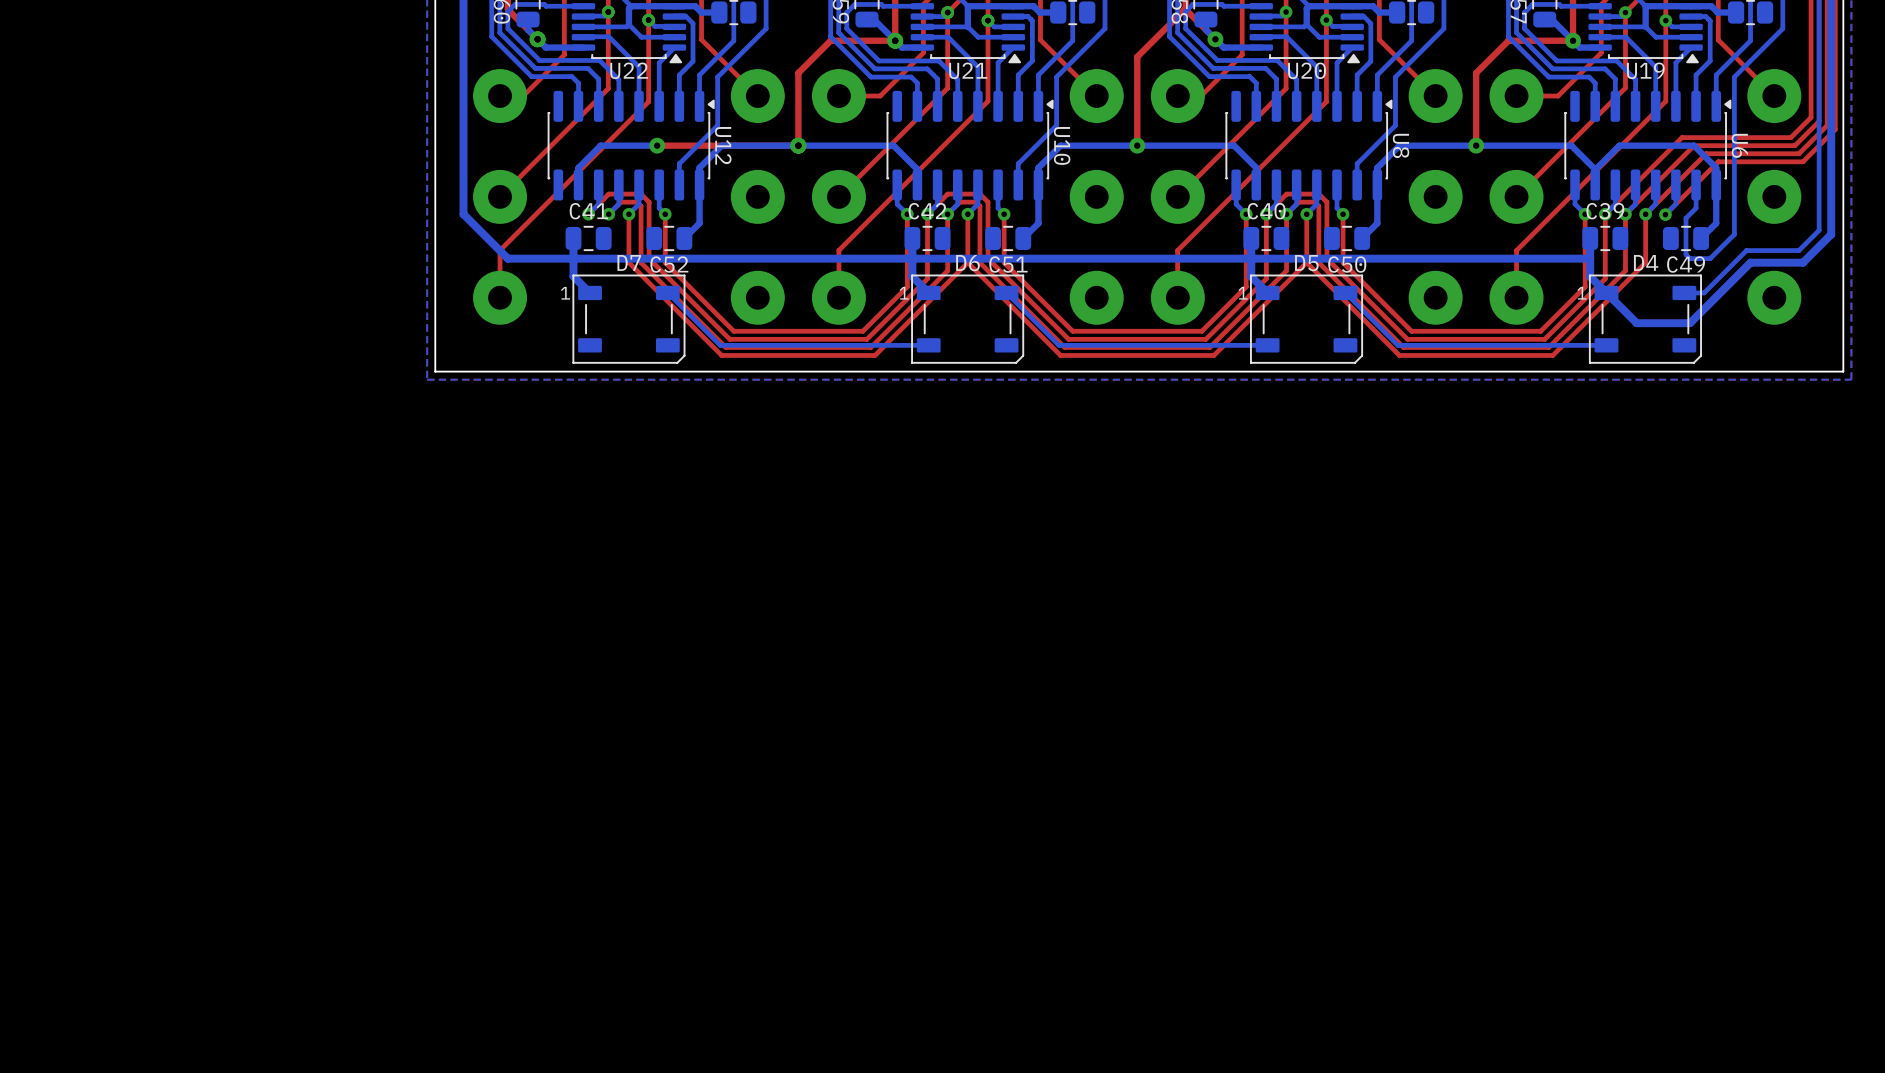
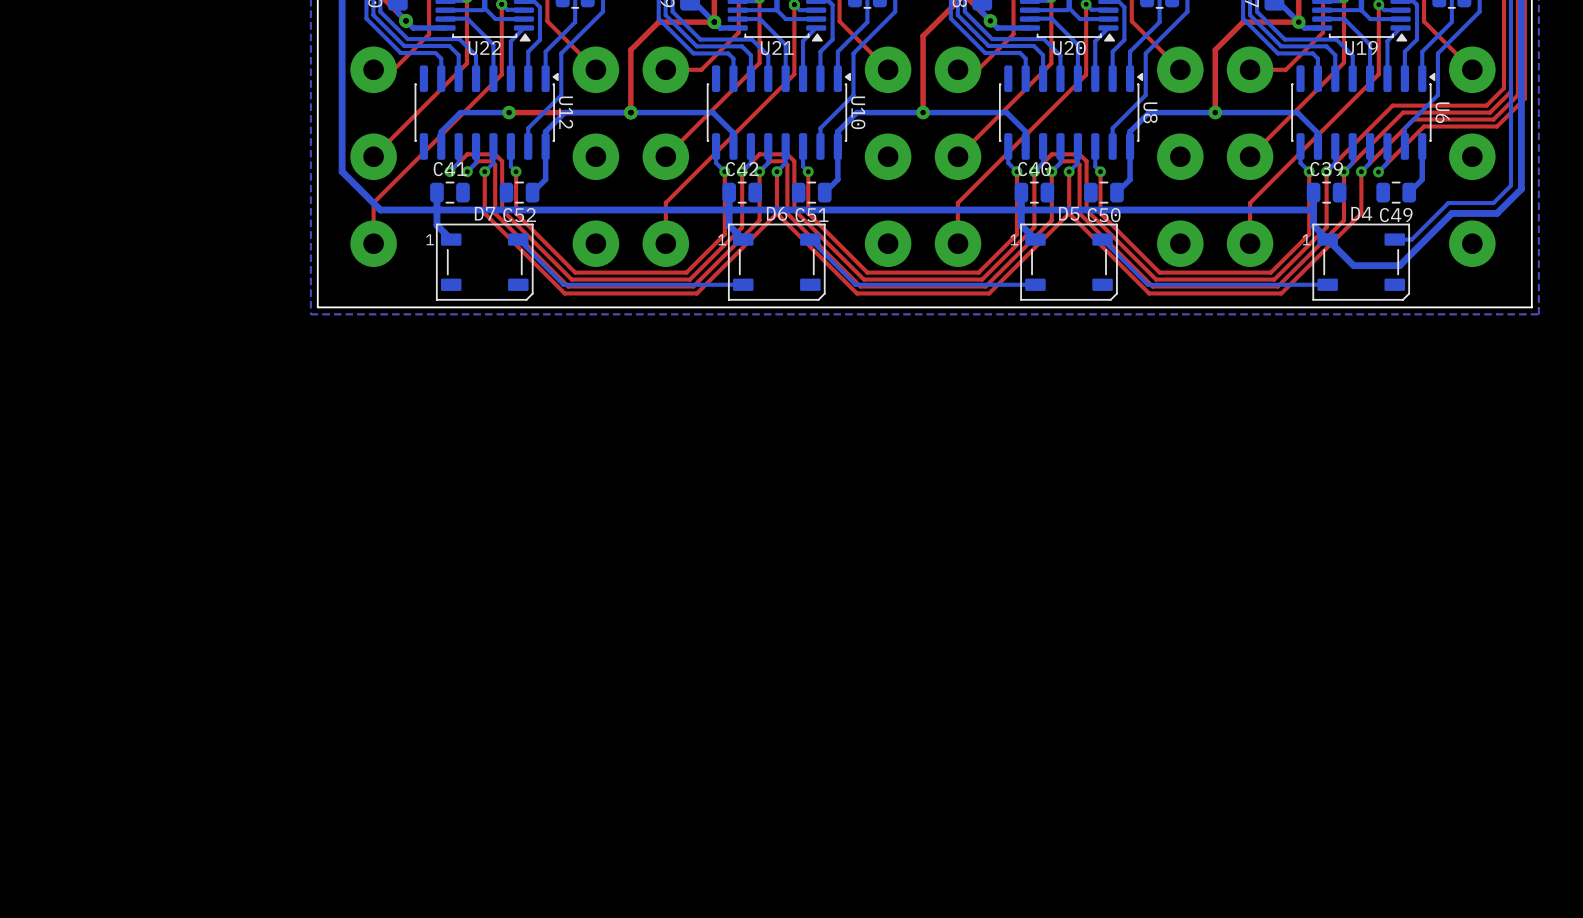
bottom track: (1734, 125) (1734, 234) (1710, 258) (1690, 258) (1685, 254) (1685, 218) (1696, 208) (1696, 184) -> (1437, 95) (1404, 128) (1404, 146)
bottom track: (1595, 169) (1619, 145) (1694, 145) (1716, 167) (1716, 184) -> none

